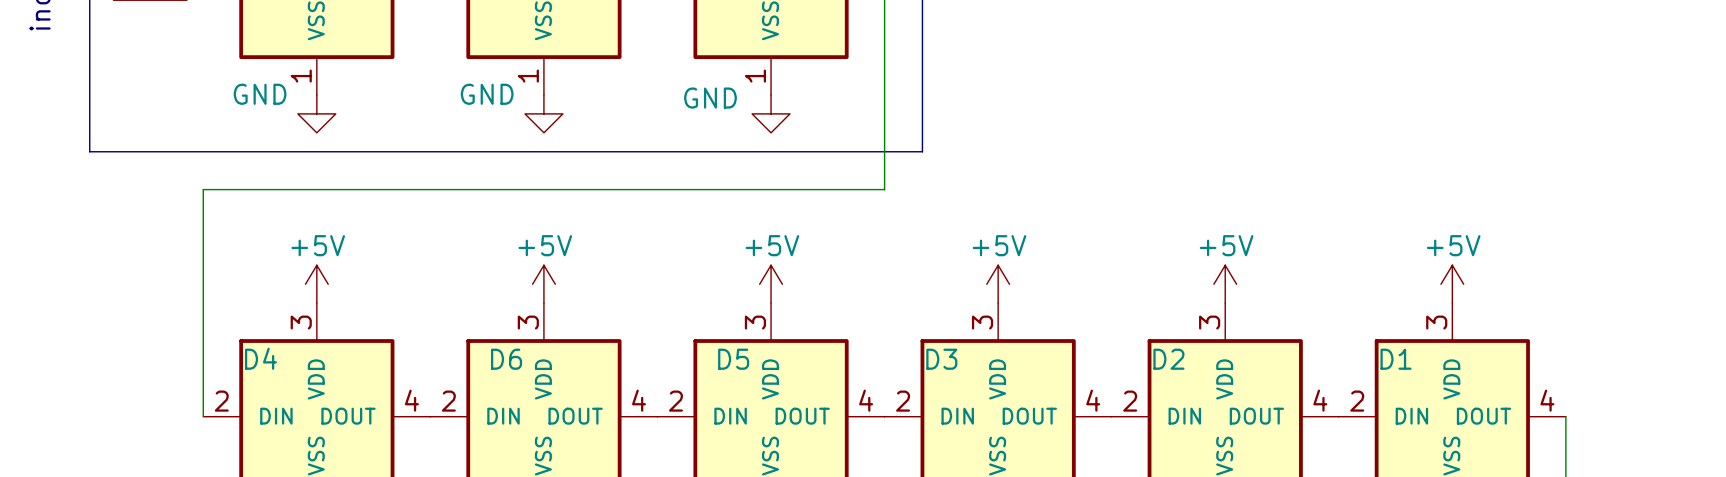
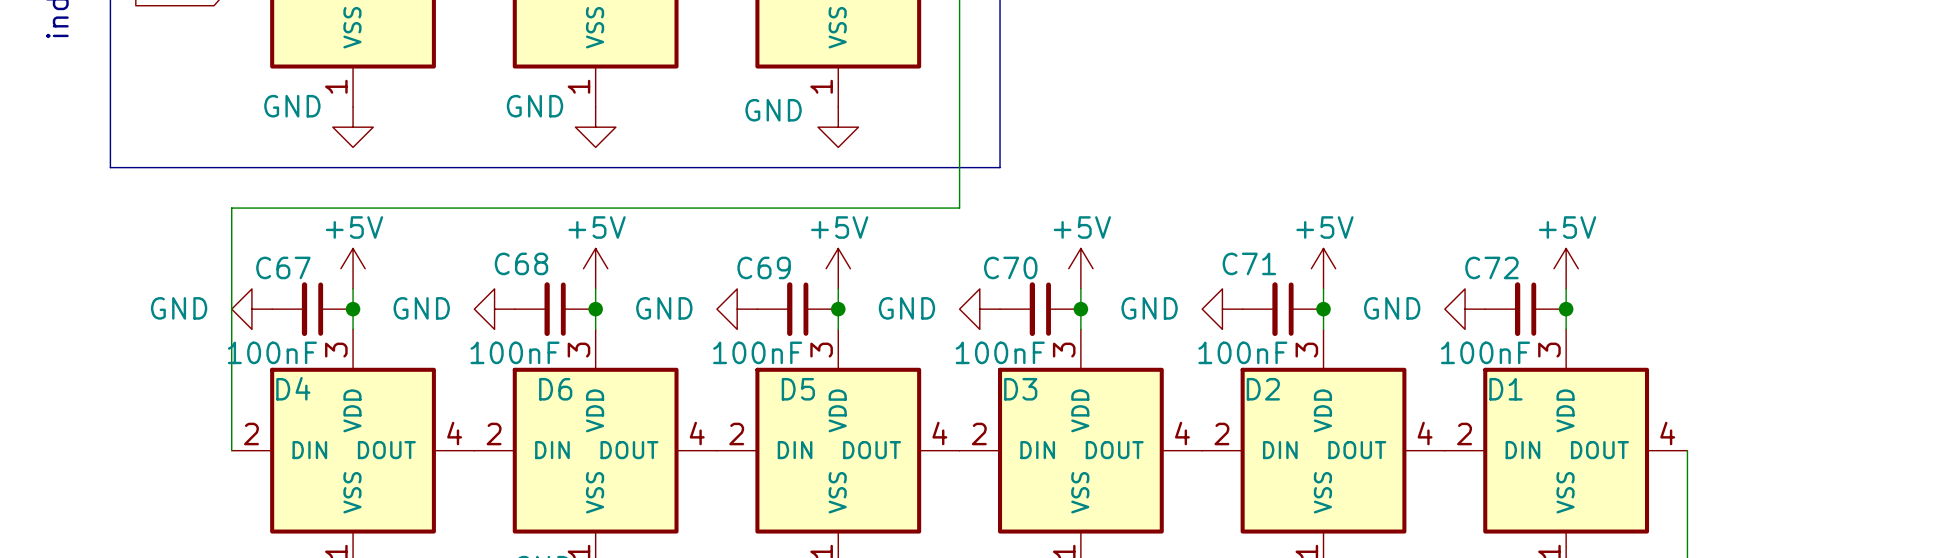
power symbol: none -> GND (251, 309)
C67: none -> 100nF (312, 309)
power symbol position: +5V (316, 284) -> +5V (353, 268)
junction: none -> (353, 309)
power symbol: none -> GND (494, 309)
C68: none -> 100nF (555, 309)
power symbol position: +5V (543, 284) -> +5V (595, 268)
junction: none -> (595, 309)
power symbol: none -> GND (737, 309)
C69: none -> 100nF (797, 309)
power symbol position: +5V (771, 284) -> +5V (838, 268)
junction: none -> (838, 309)
power symbol: none -> GND (979, 309)
C70: none -> 100nF (1040, 309)
power symbol position: +5V (998, 284) -> +5V (1080, 268)
junction: none -> (1080, 309)
power symbol: none -> GND (1222, 309)
C71: none -> 100nF (1283, 309)
power symbol position: +5V (1225, 284) -> +5V (1323, 268)
junction: none -> (1323, 309)
power symbol: none -> GND (1465, 309)
C72: none -> 100nF (1525, 309)
power symbol position: +5V (1452, 284) -> +5V (1566, 268)
junction: none -> (1566, 309)

